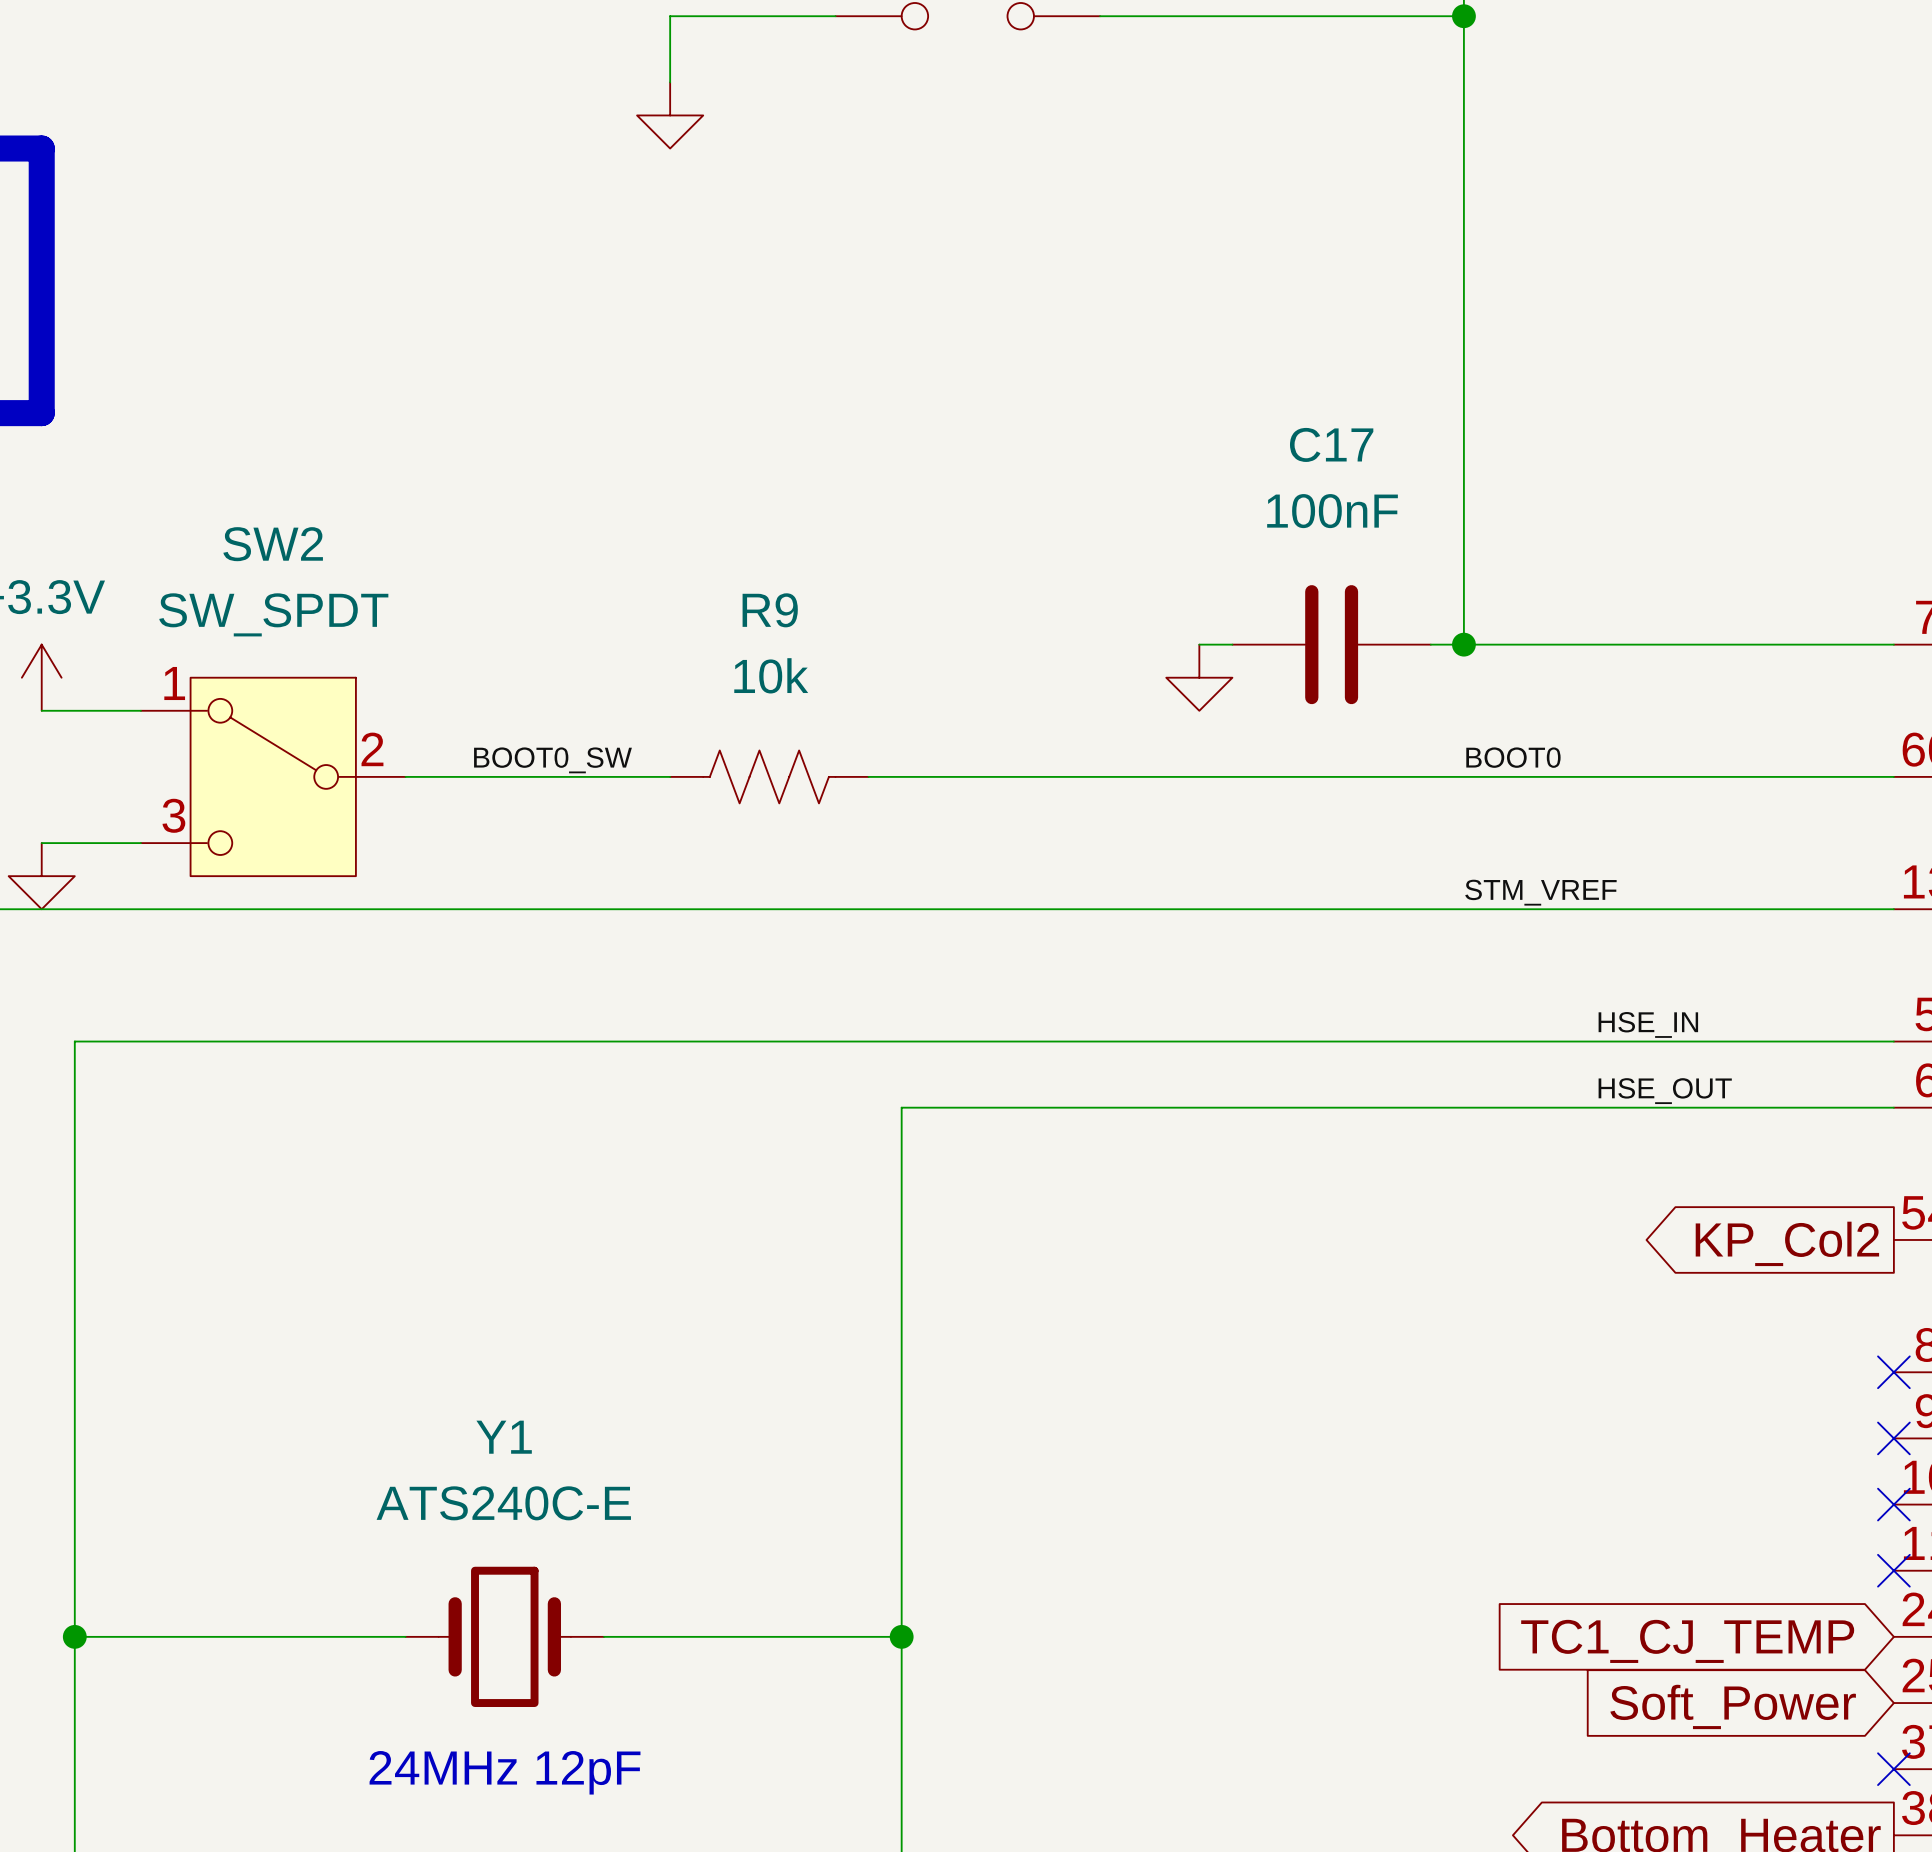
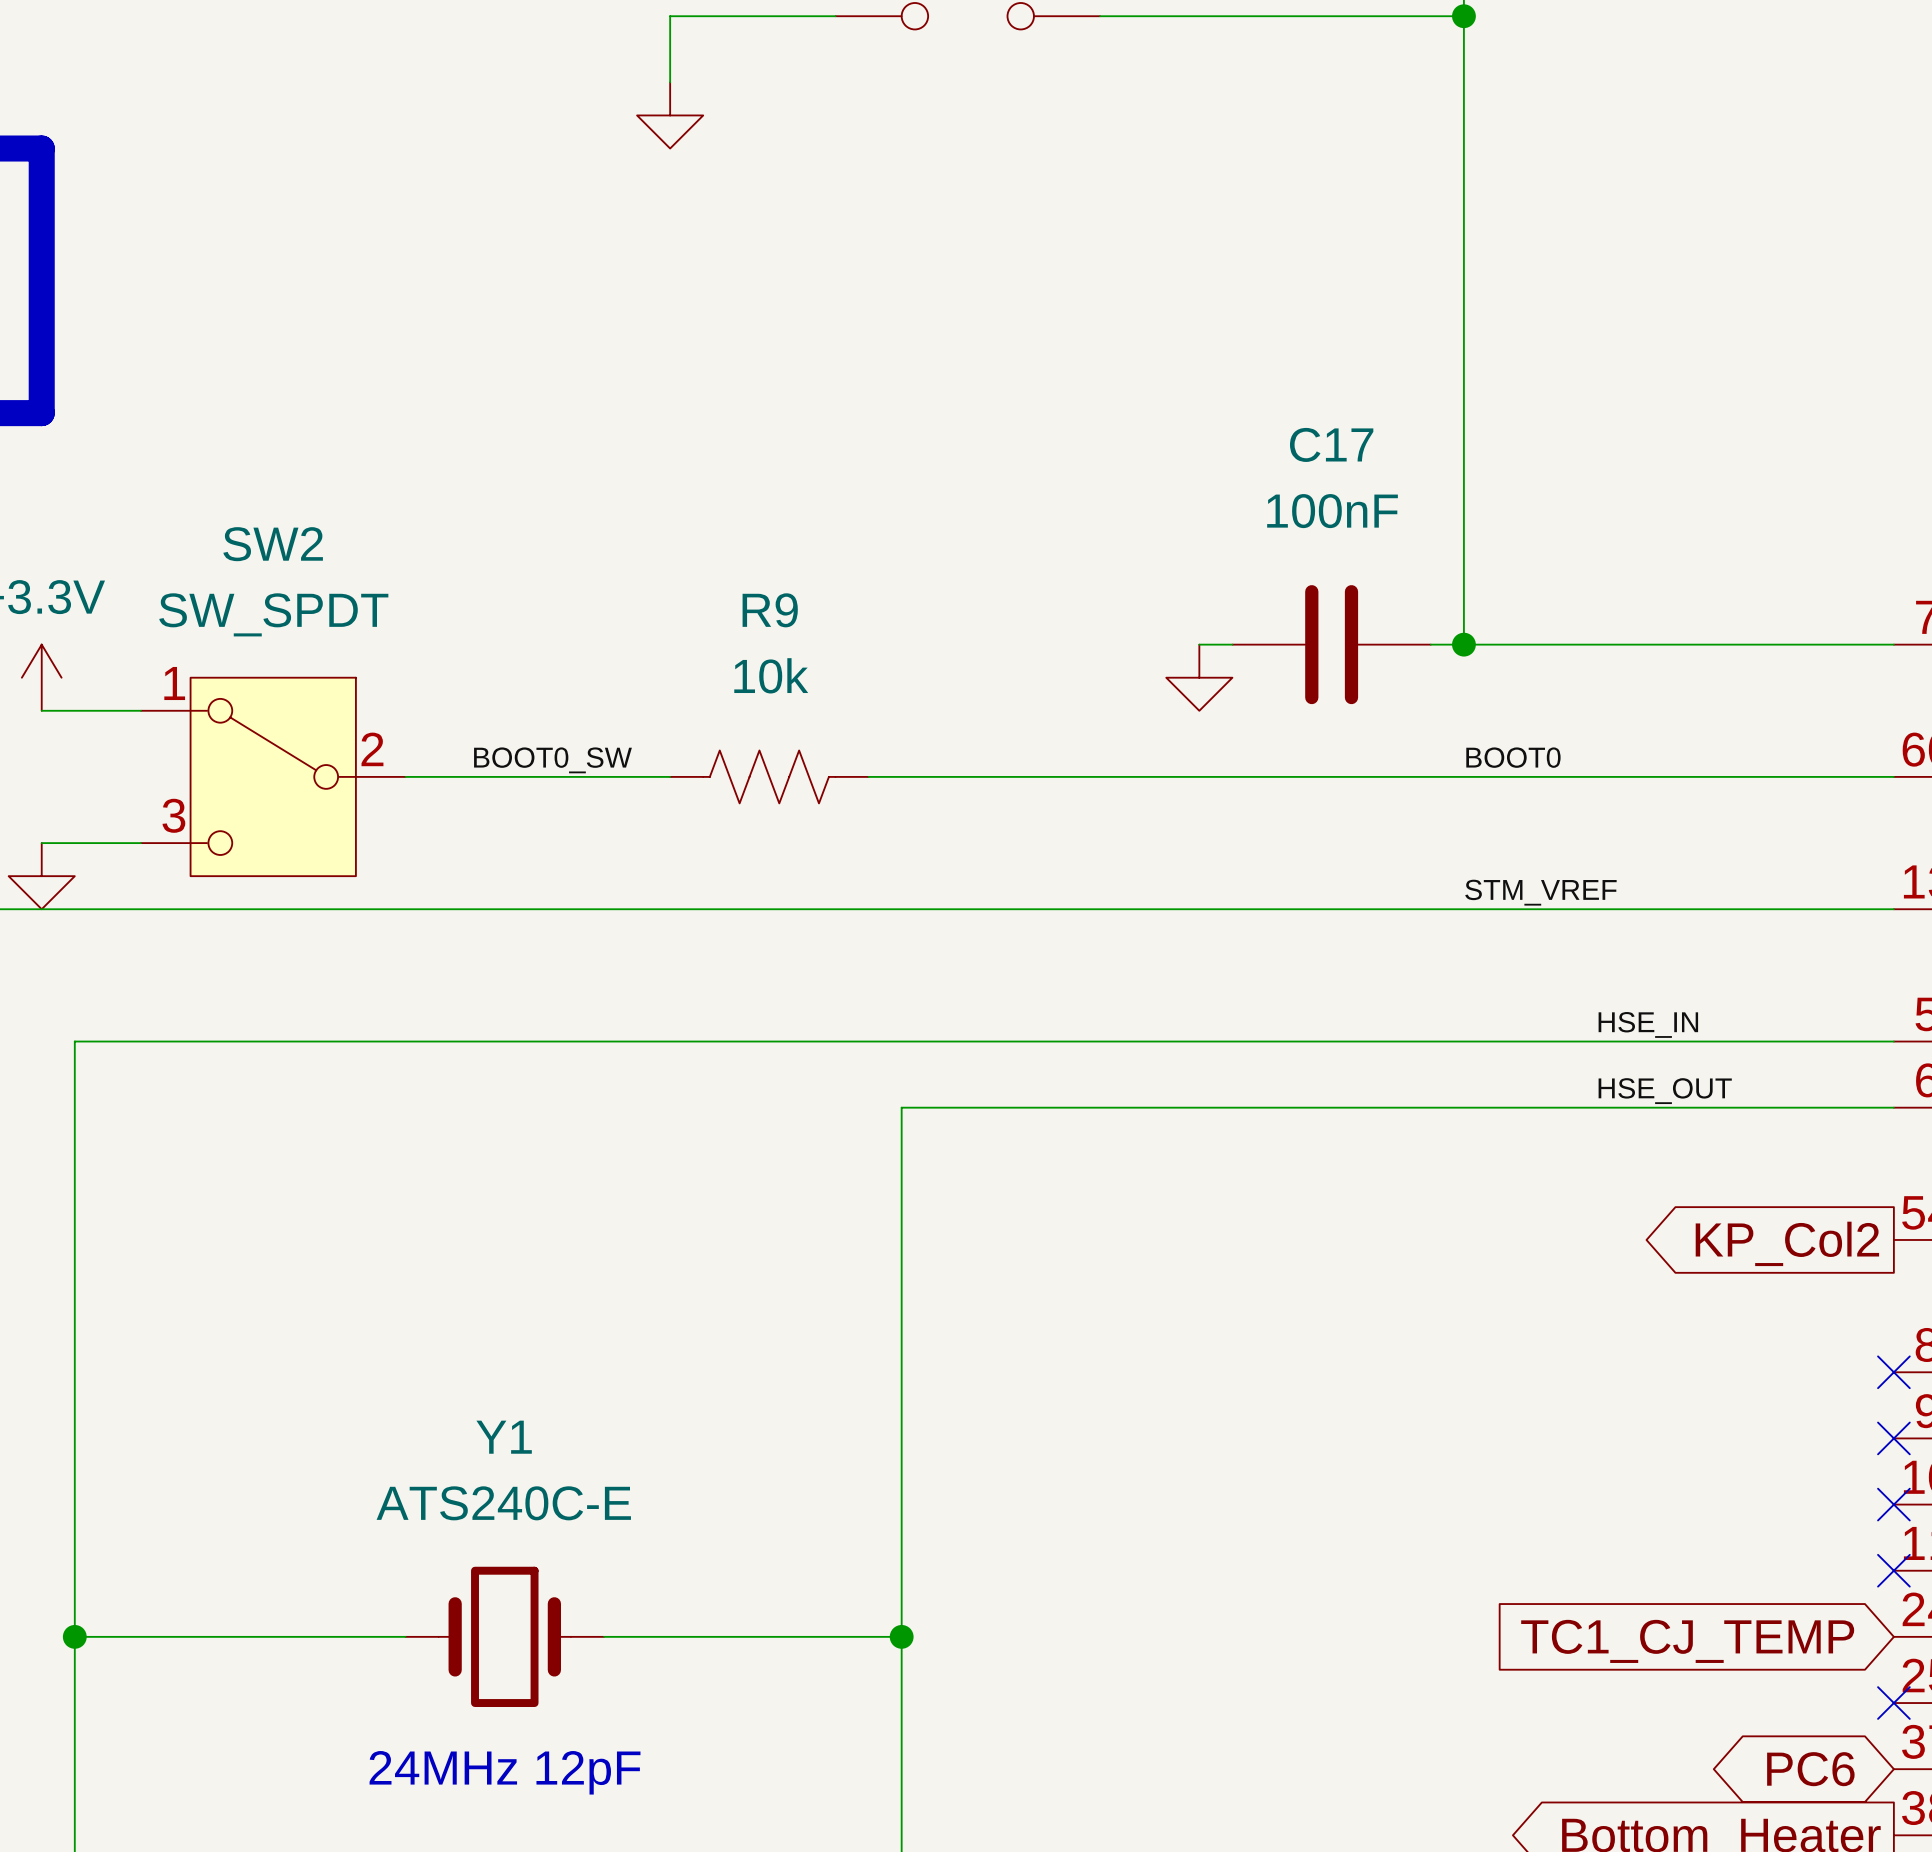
global label: Soft_Power (1733, 1706) -> none
global label: none -> PC6 (1810, 1769)
no-connect mark position: (1893, 1769) -> (1893, 1703)

